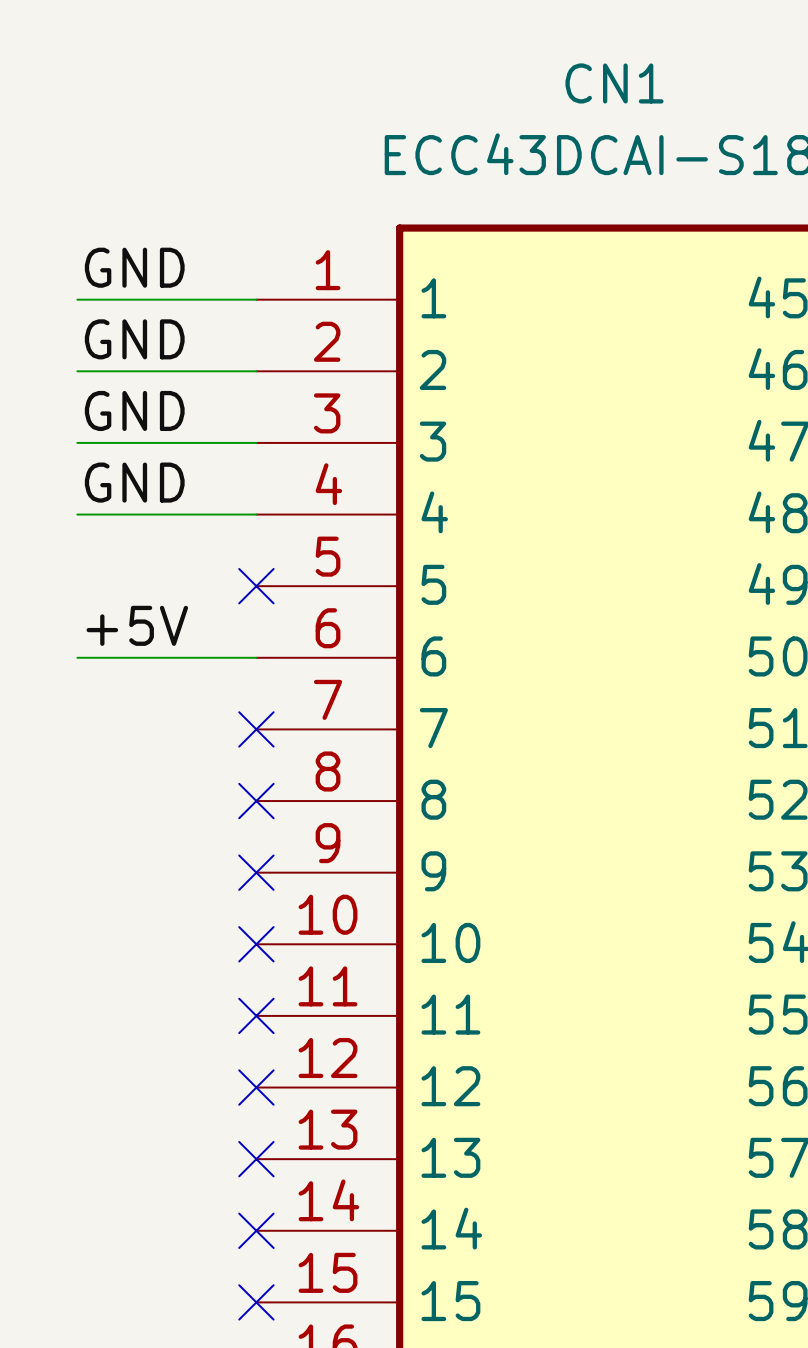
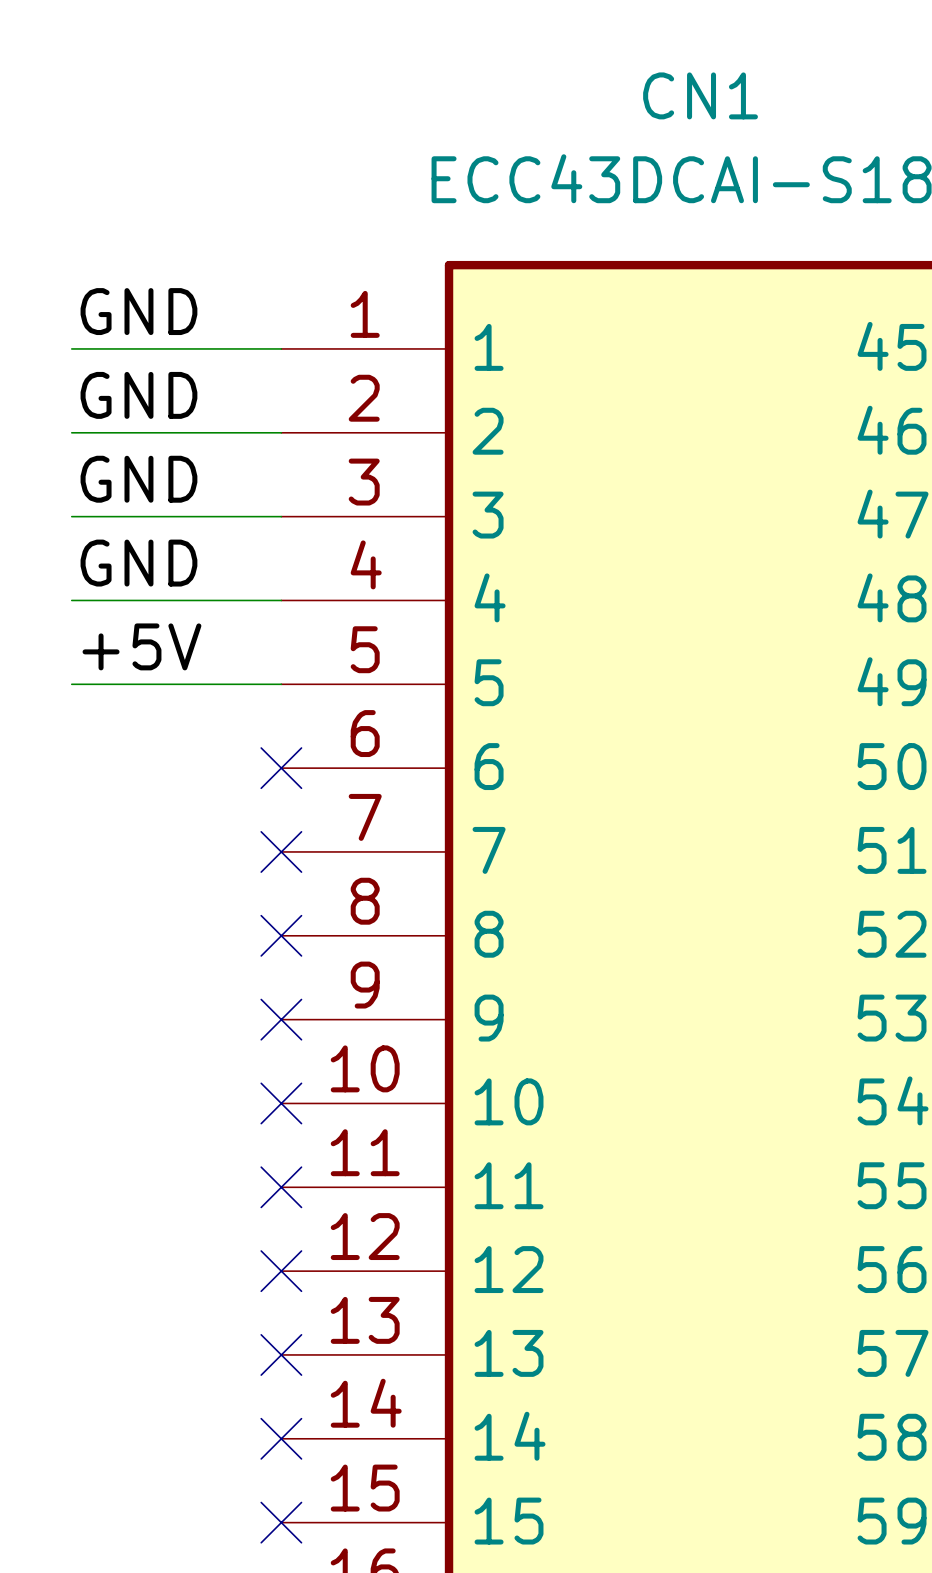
no-connect mark position: (256, 586) -> (281, 768)
label position: +5V (137, 625) -> +5V (141, 646)
wire: (77, 657) (256, 657) -> (71, 684) (281, 684)

